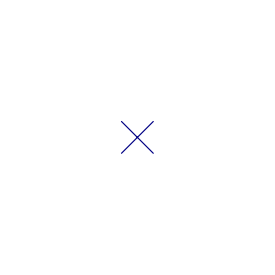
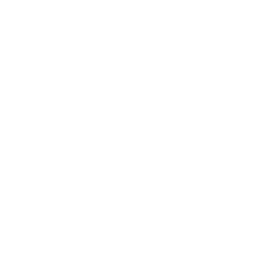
no-connect mark: (137, 137) -> none

